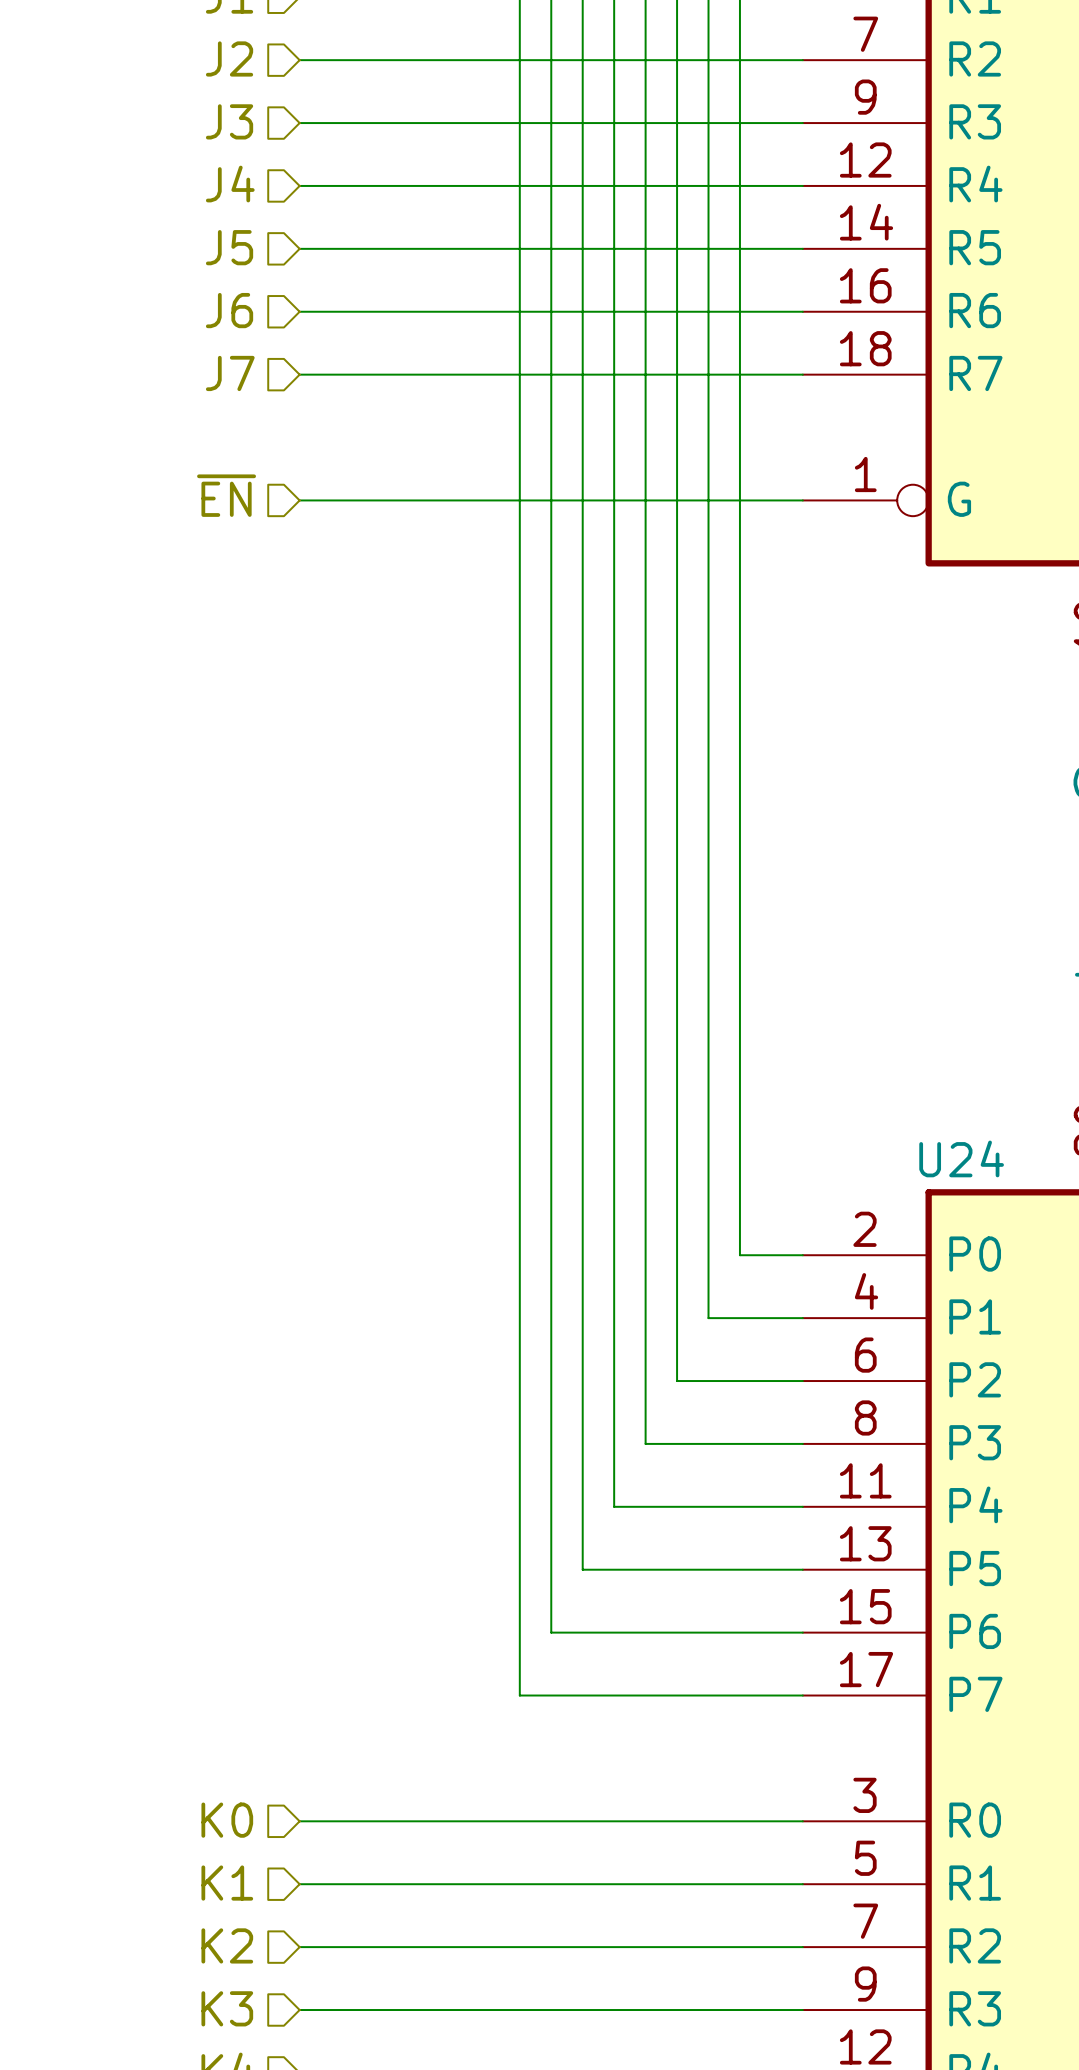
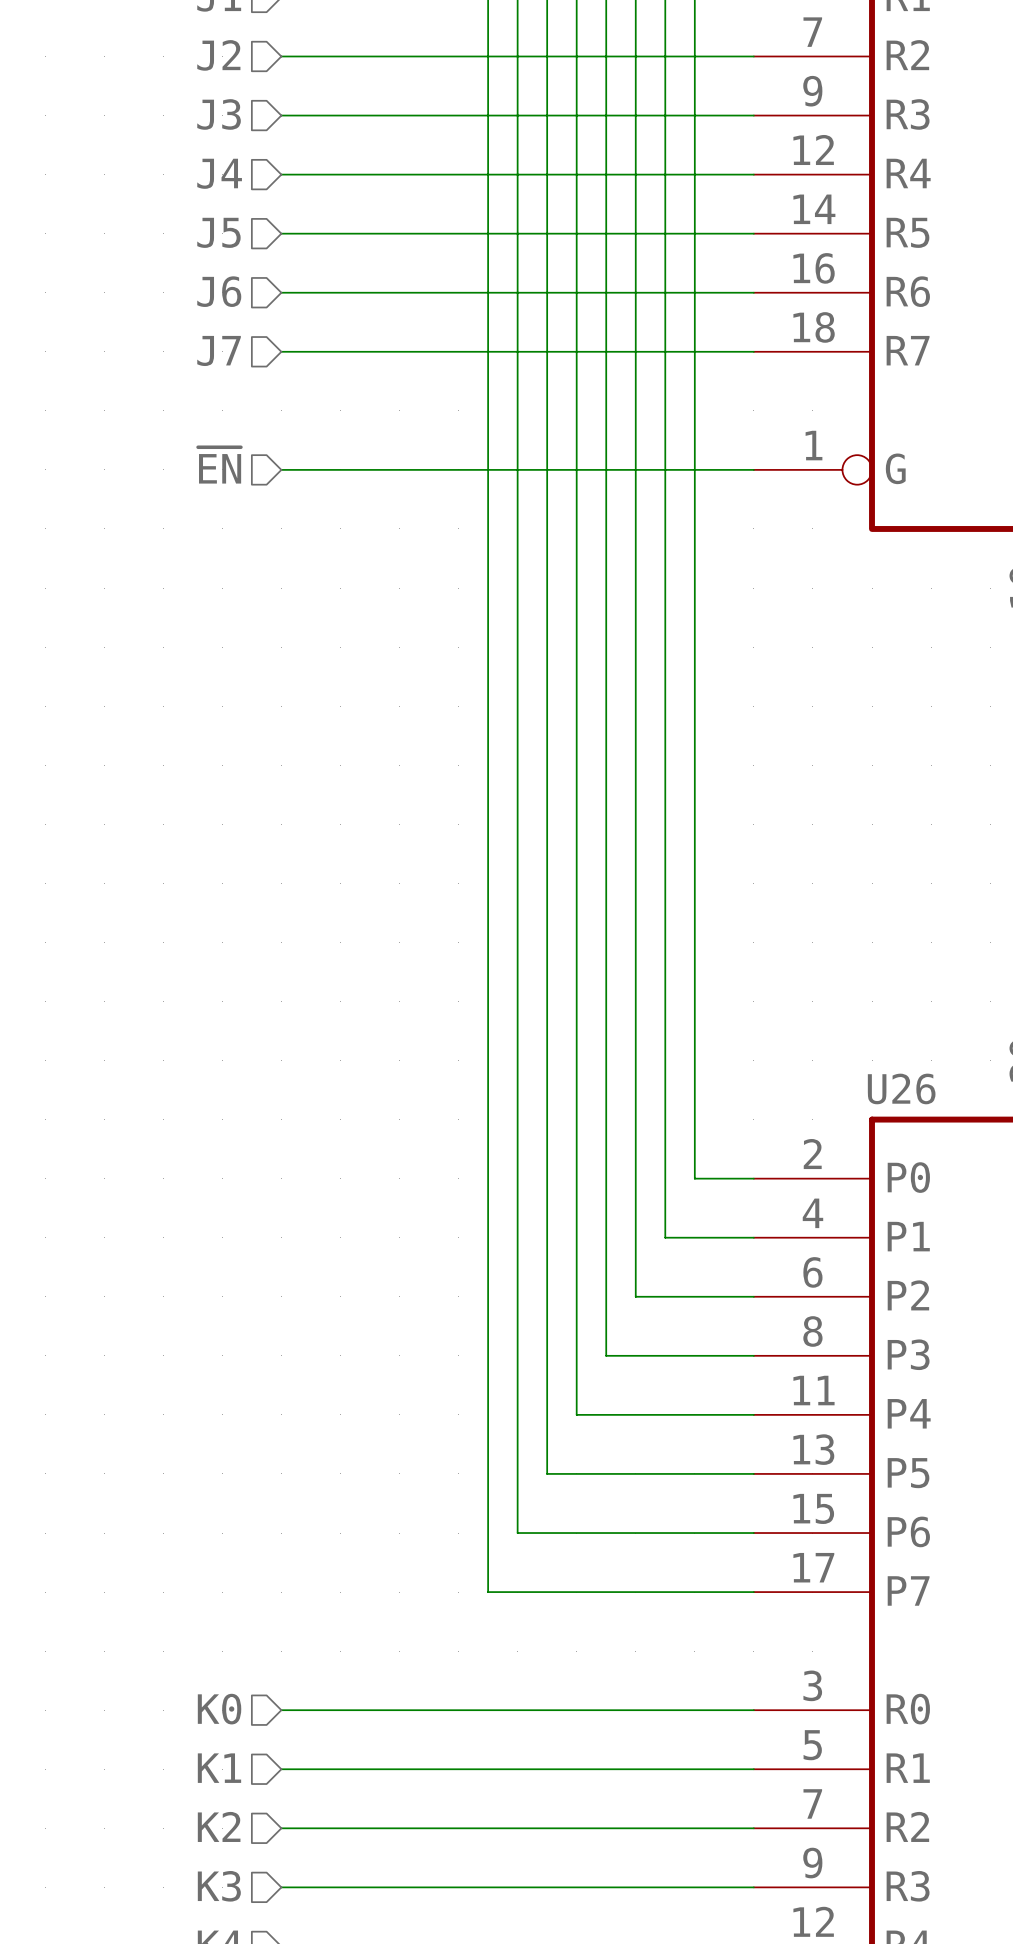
U24 name: U24 (961, 1158) -> U26 (901, 1088)

